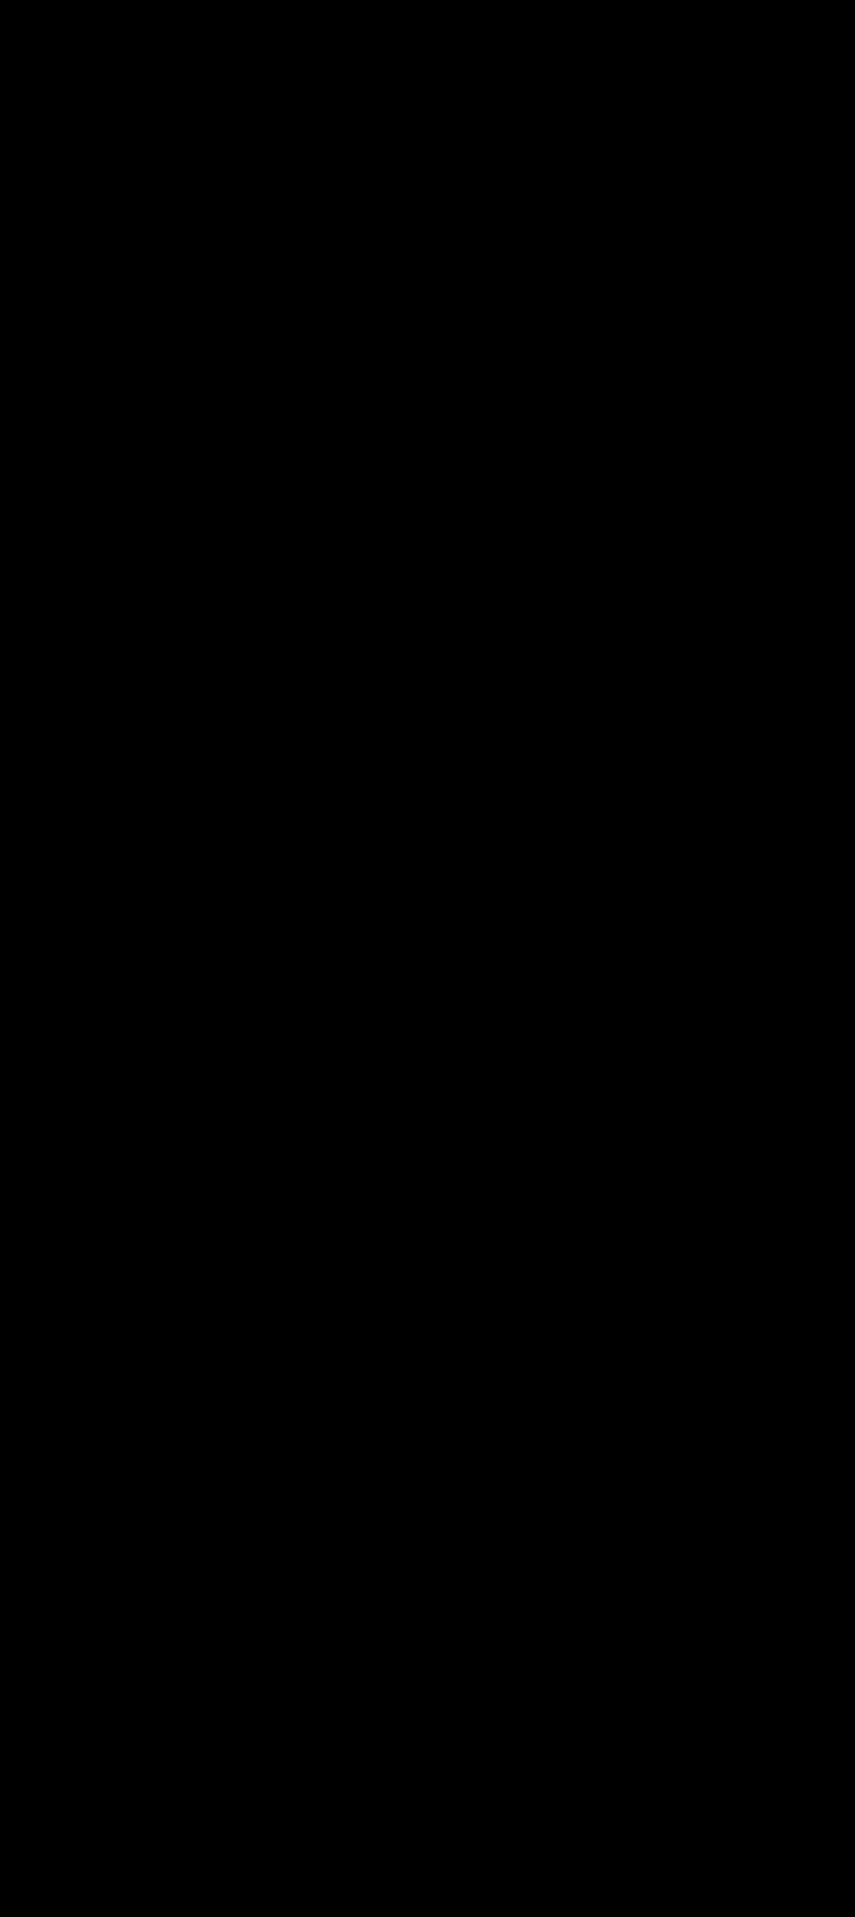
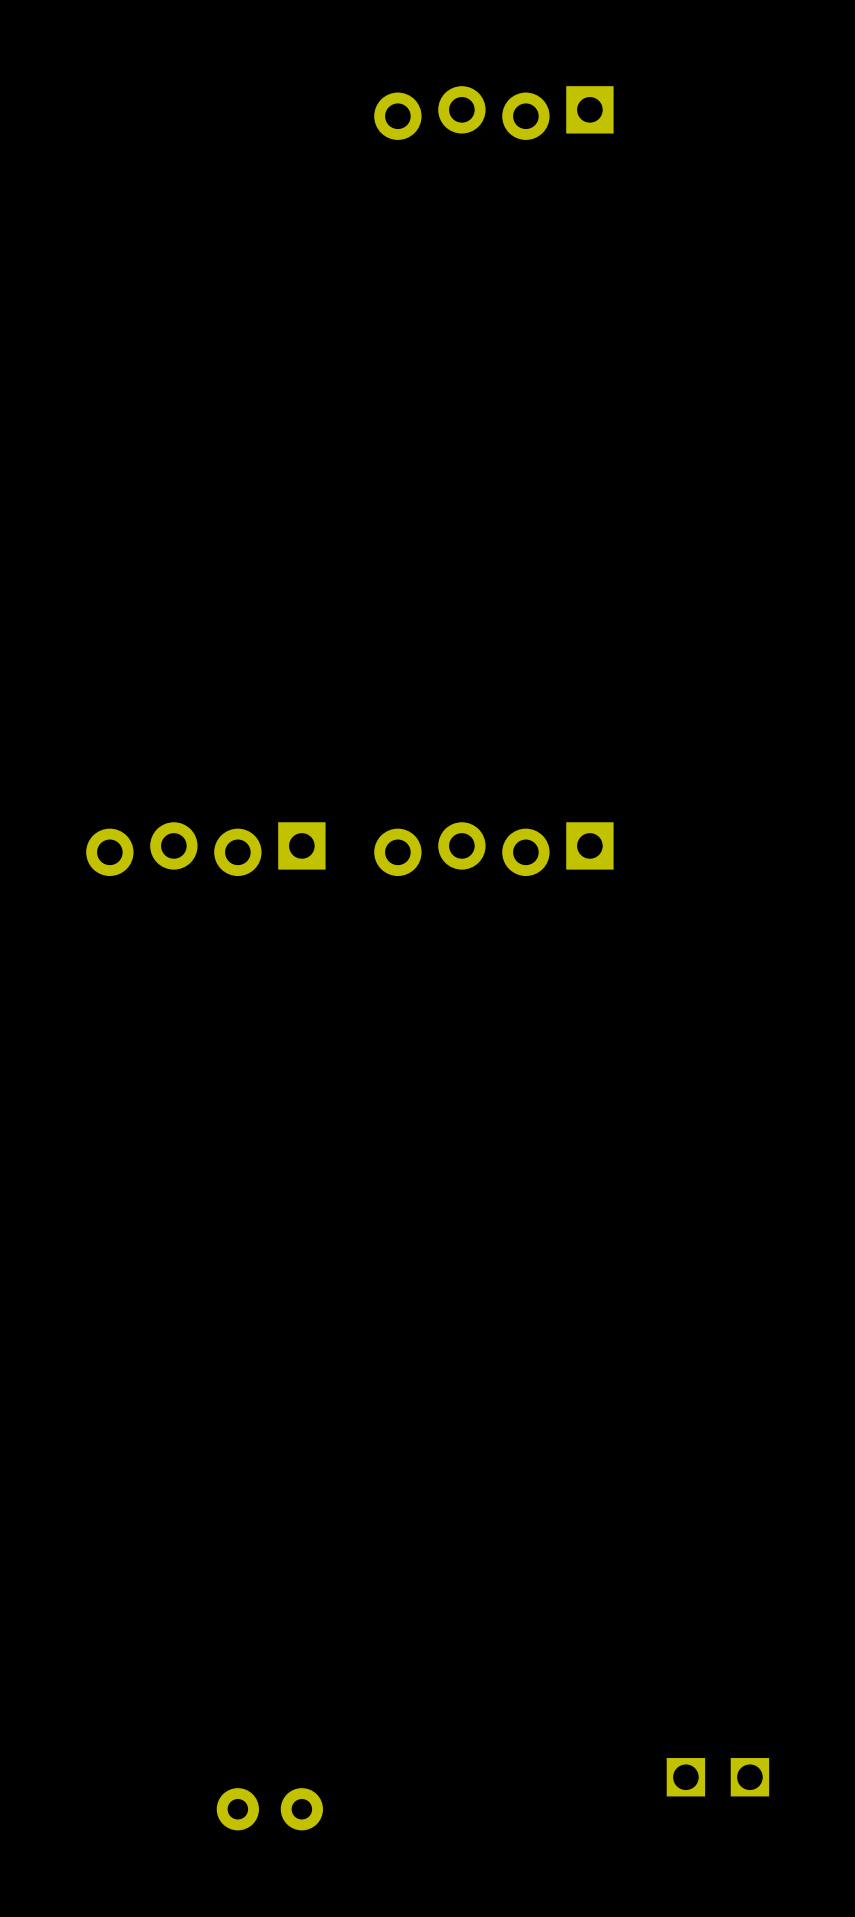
part: none -> (493, 113)
part: none -> (205, 849)
part: none -> (493, 849)
part: none -> (717, 1777)
part: none -> (269, 1809)

